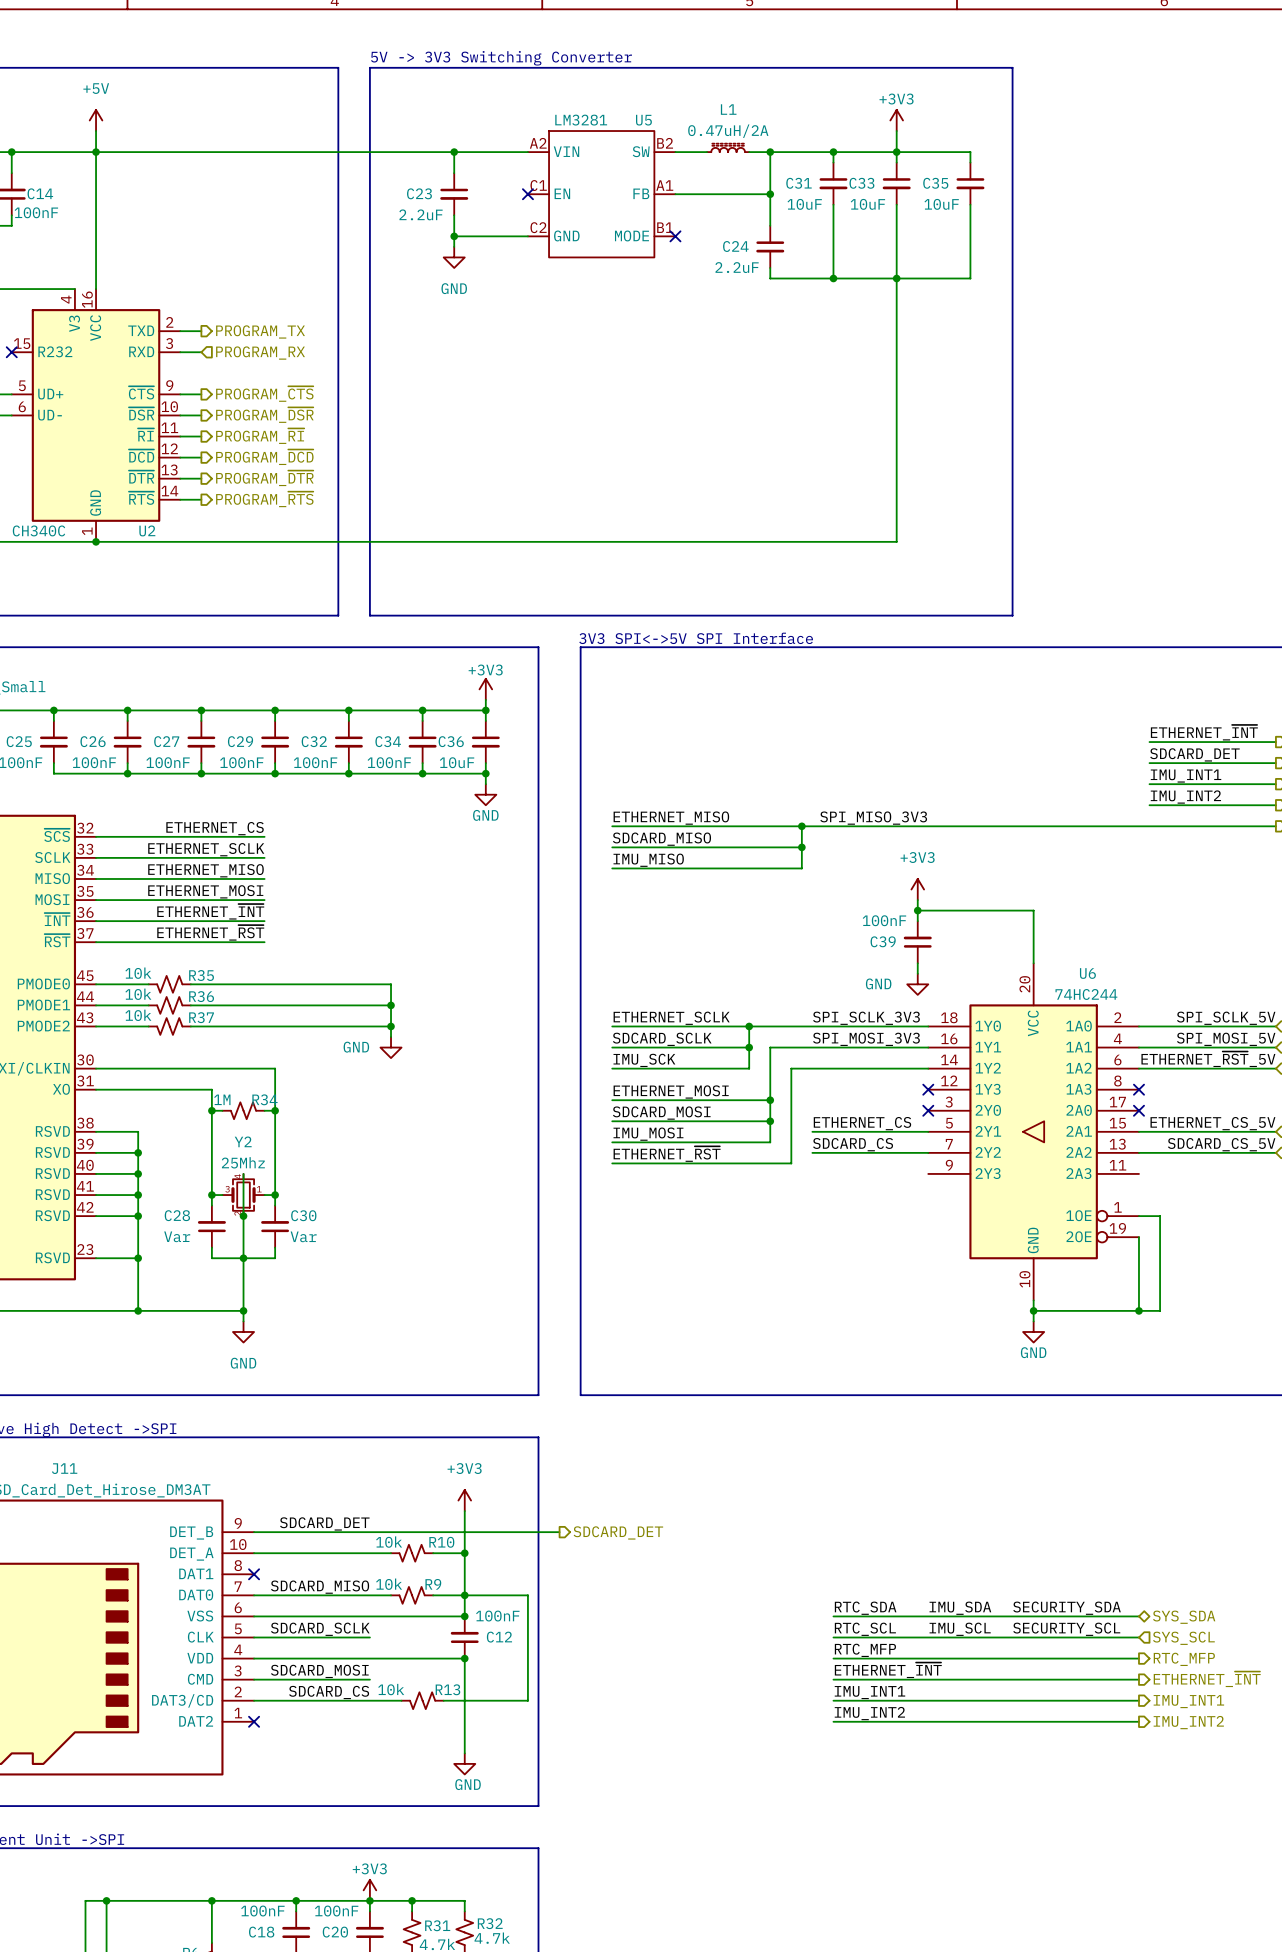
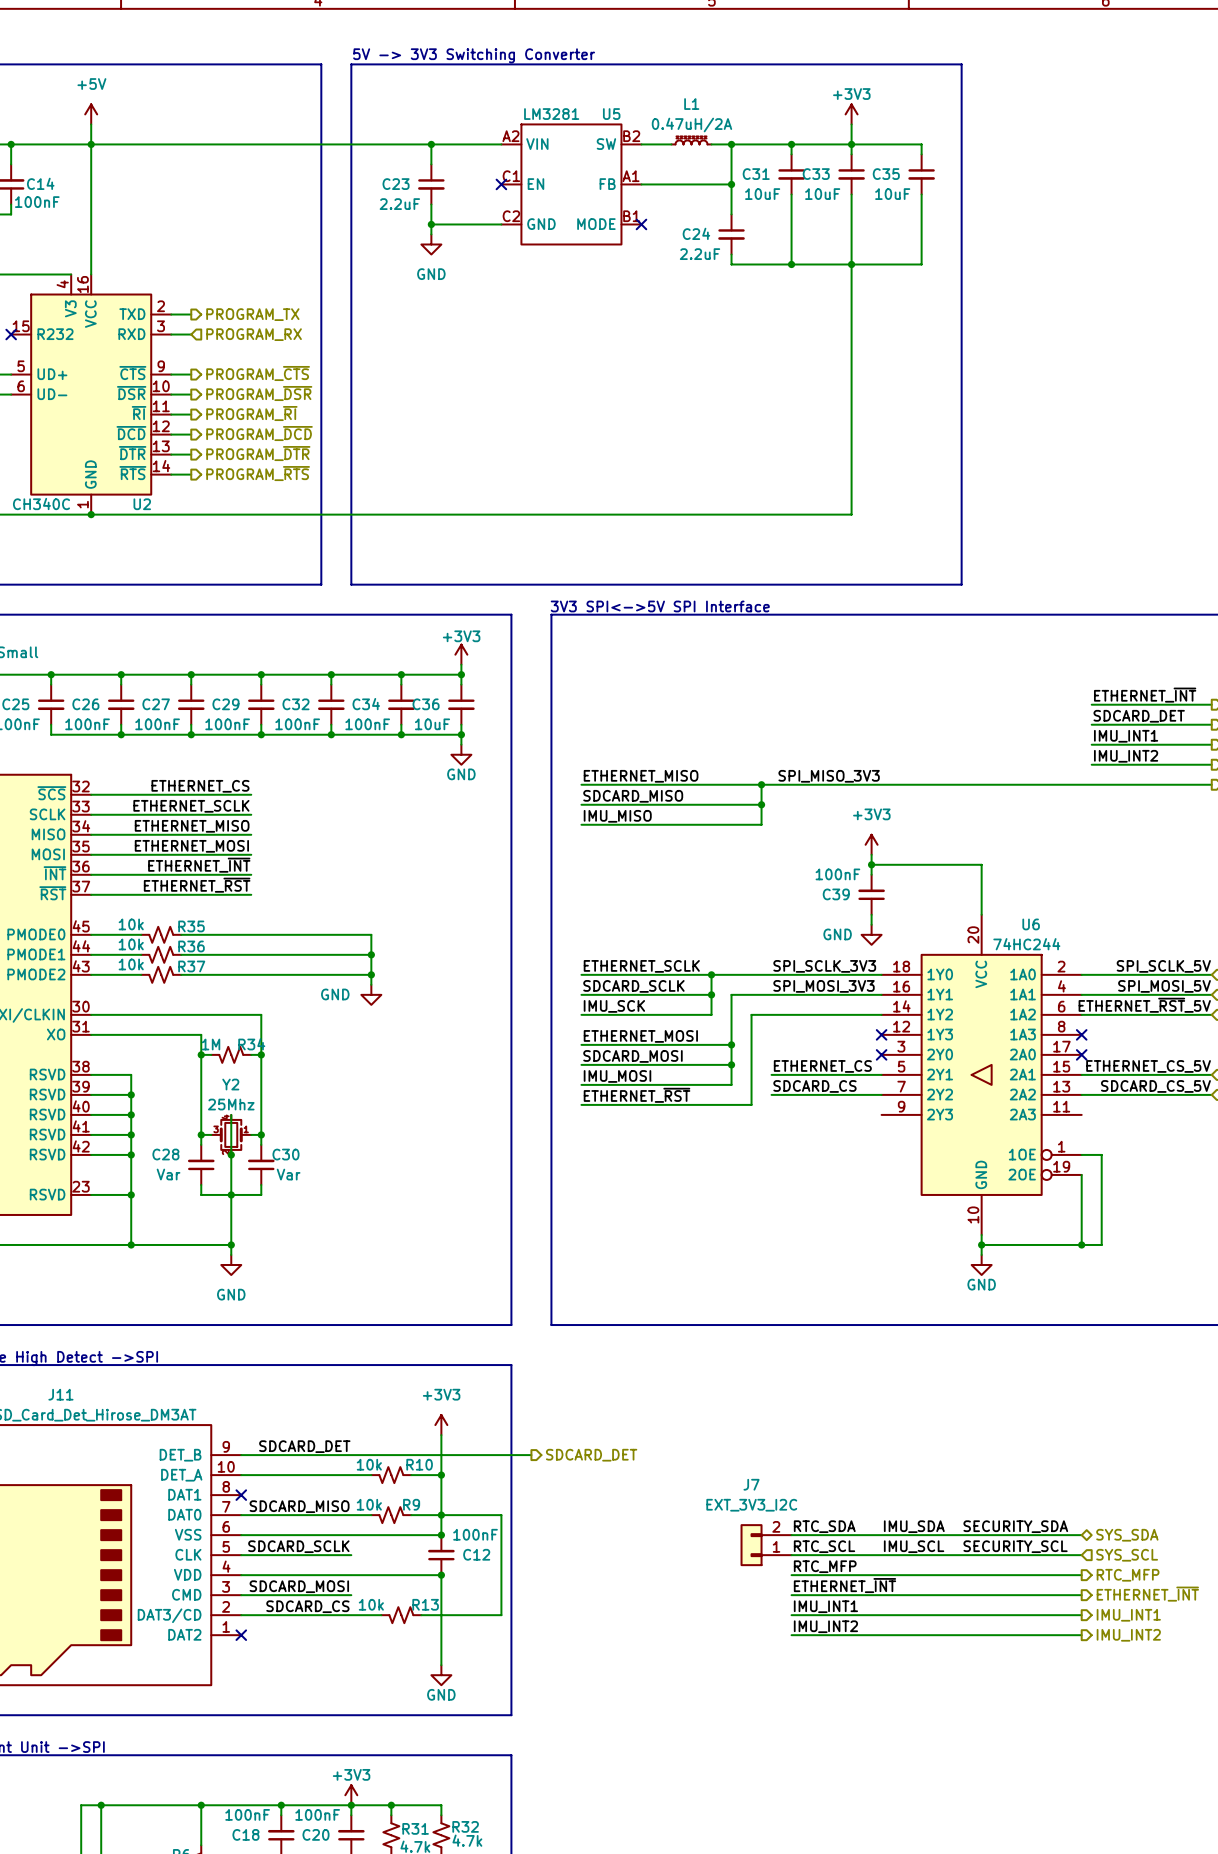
J7: none -> EXT_3V3_I2C (766, 1545)

